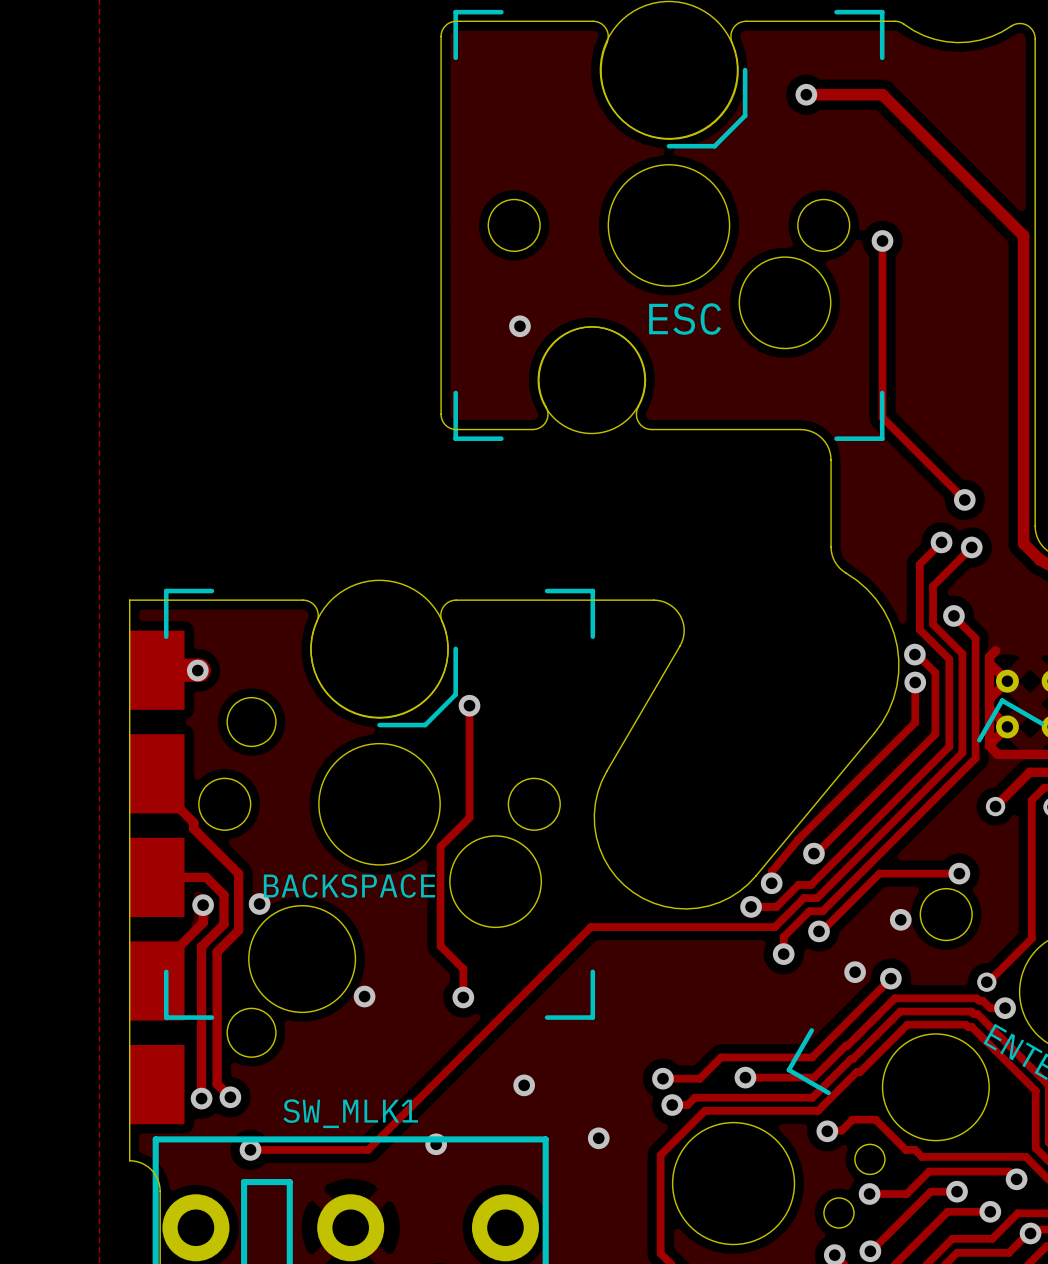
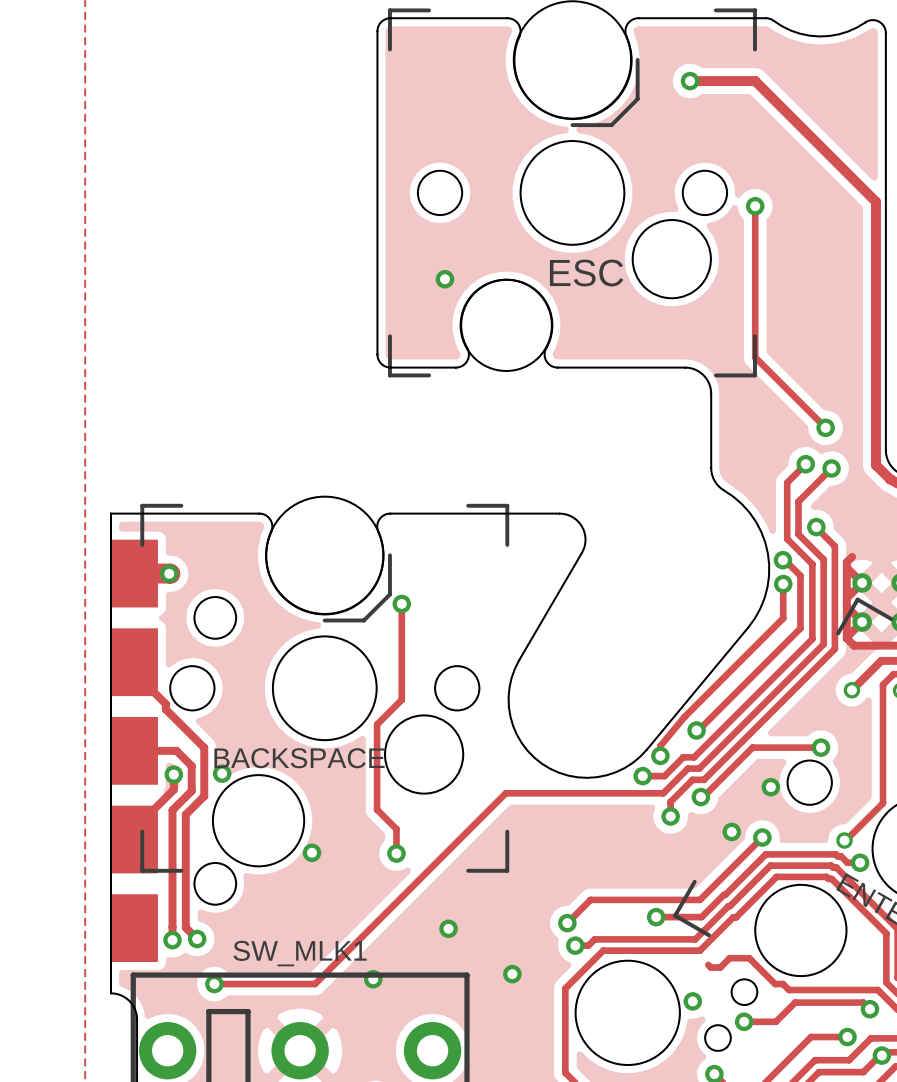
track: (817, 1051) (812, 1057) (721, 1057) (699, 1078) (662, 1078) -> (700, 899) (590, 899) (567, 923)
track: (819, 1071) (814, 1077) (745, 1077) -> (701, 917) (656, 917)
via position: (745, 1077) -> (656, 917)
via: (827, 1131) -> none
via: none -> (692, 1001)
track: (957, 1191) (930, 1191) (870, 1251) -> none
via: (957, 1191) -> none
via: (870, 1251) -> none

